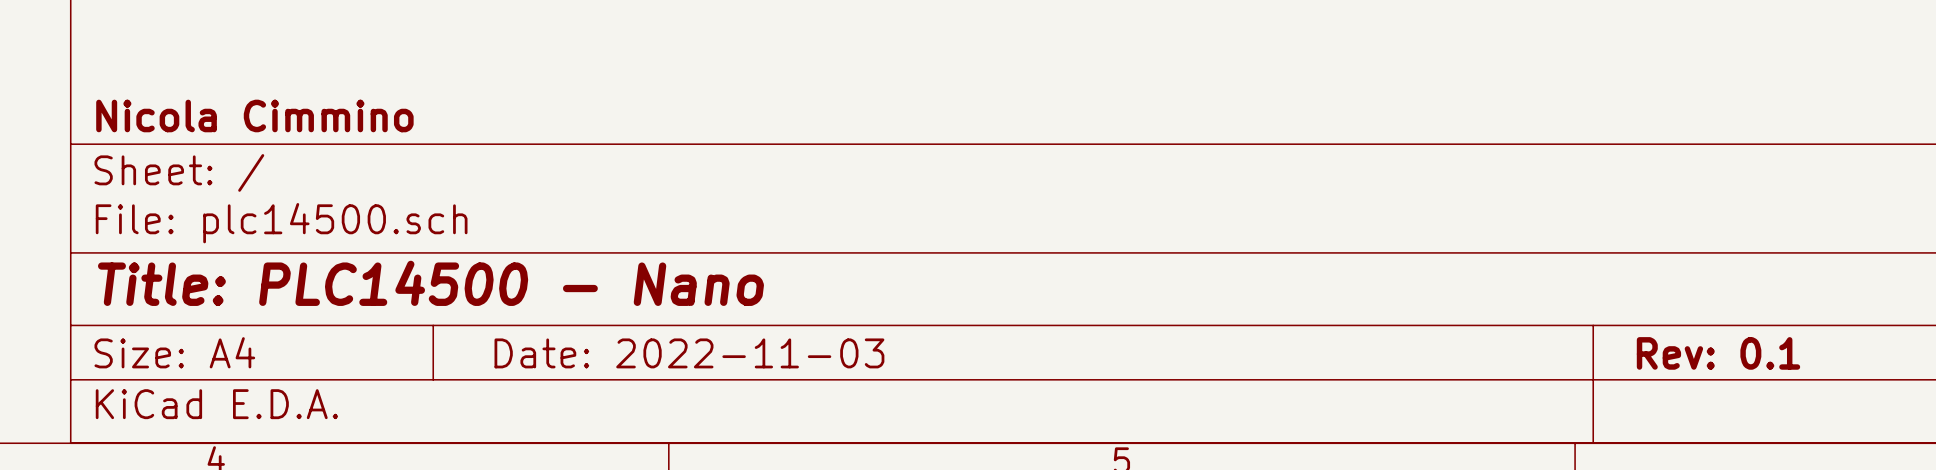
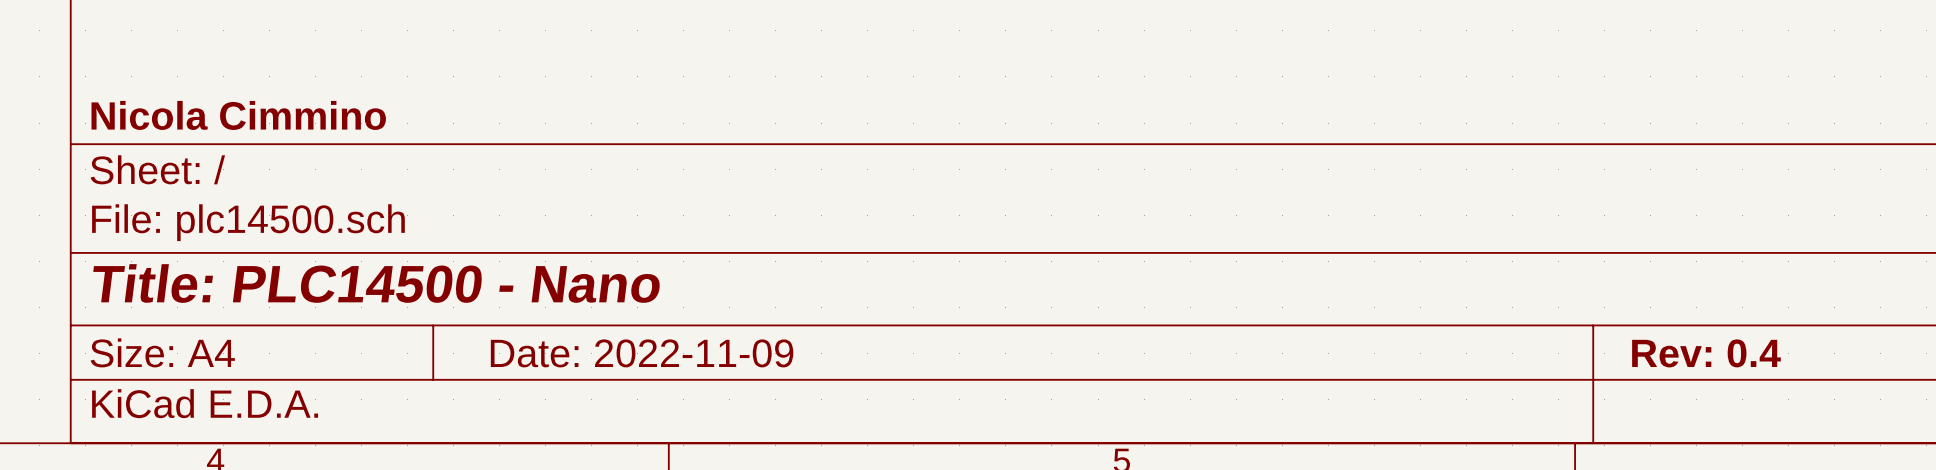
title block: Date: 2022-11-03 (689, 353) -> Date: 2022-11-09 (642, 353)
title block: Rev: 0.1 (1718, 353) -> Rev: 0.4 (1706, 353)

